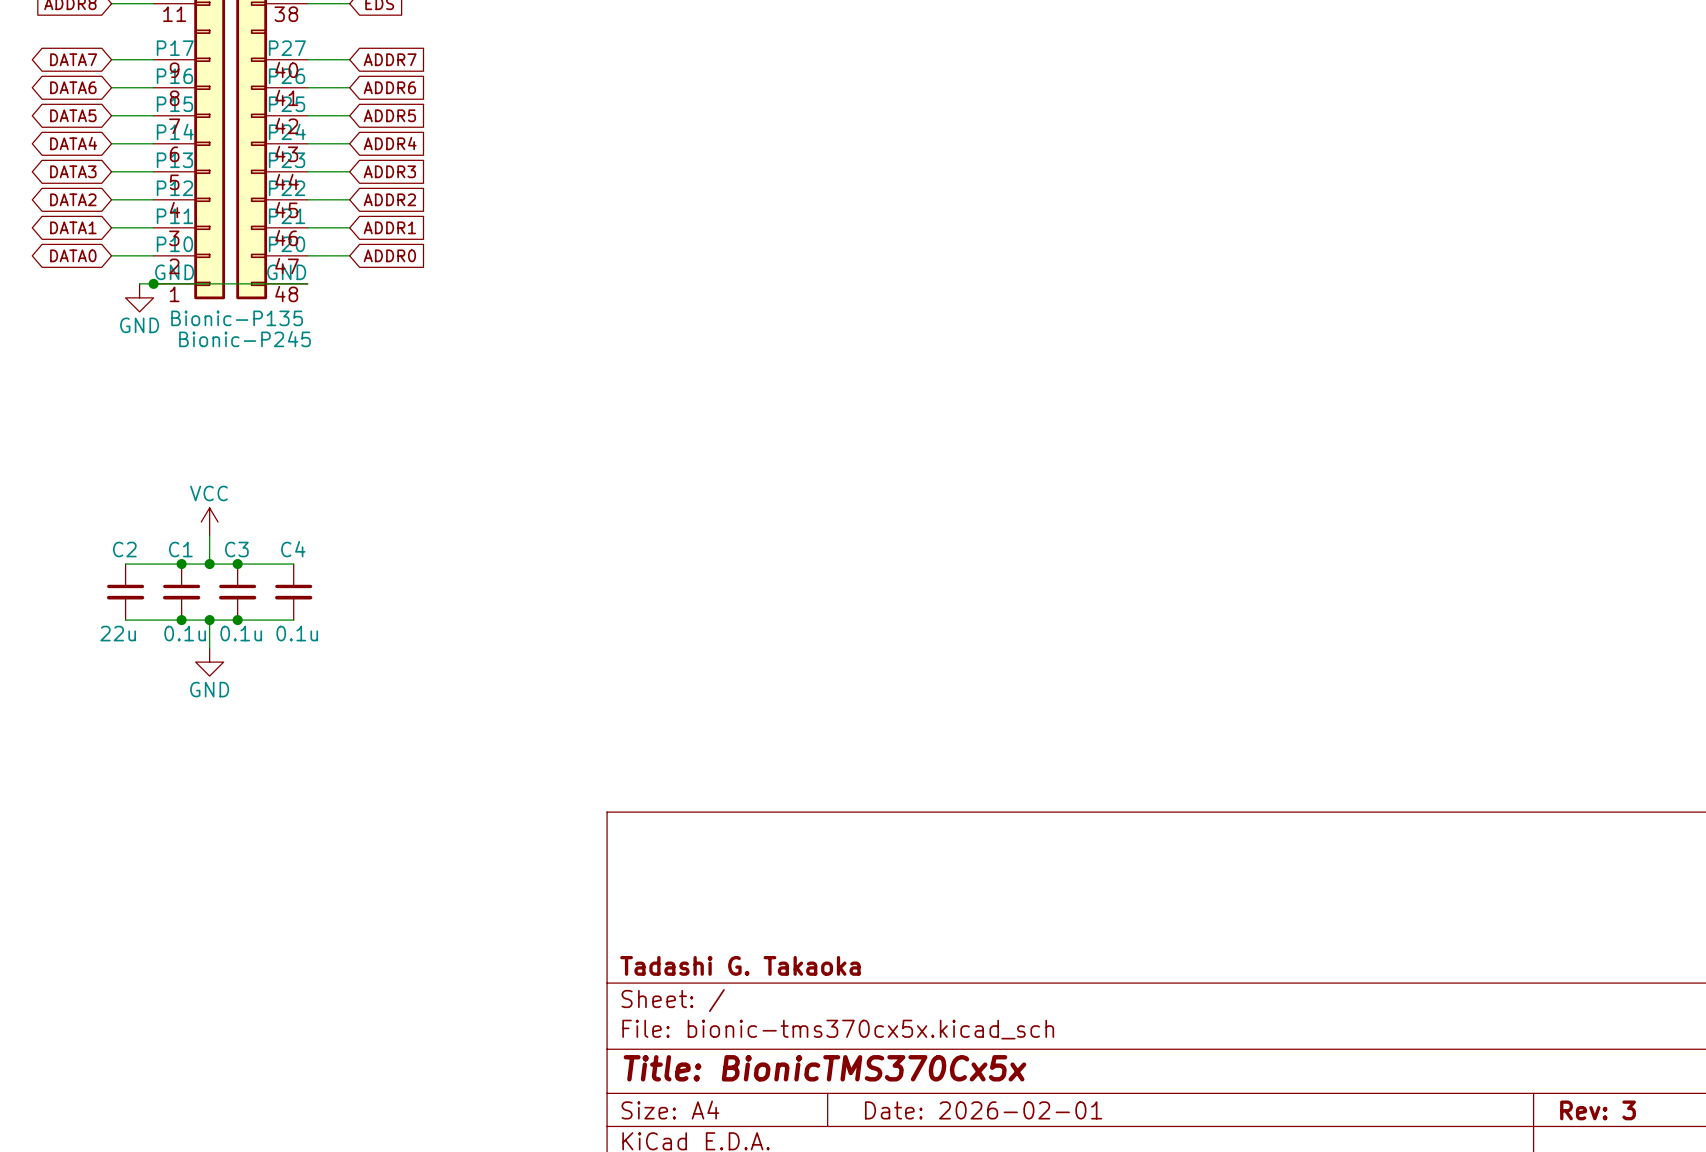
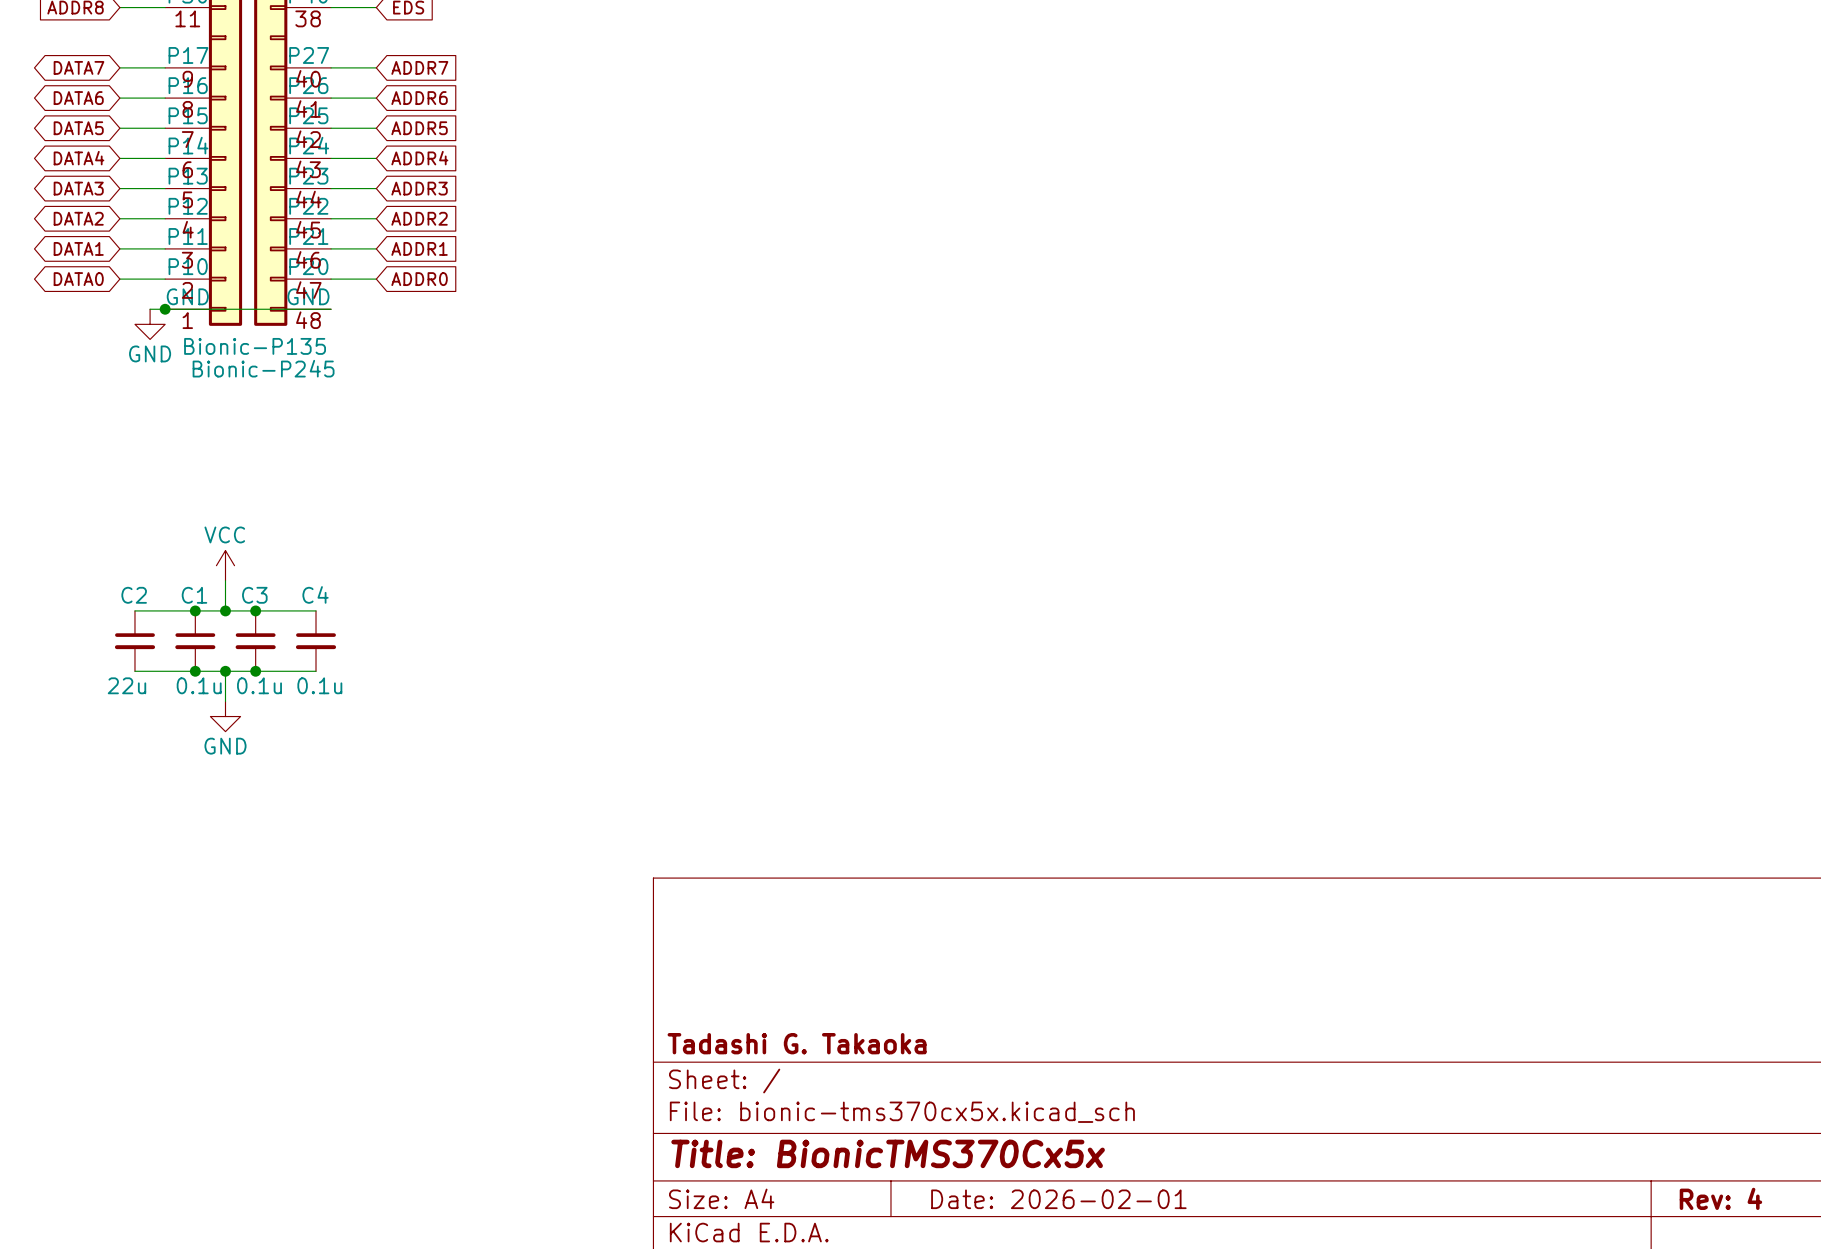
title block: Rev: 3 (1598, 1110) -> Rev: 4 (1720, 1198)

